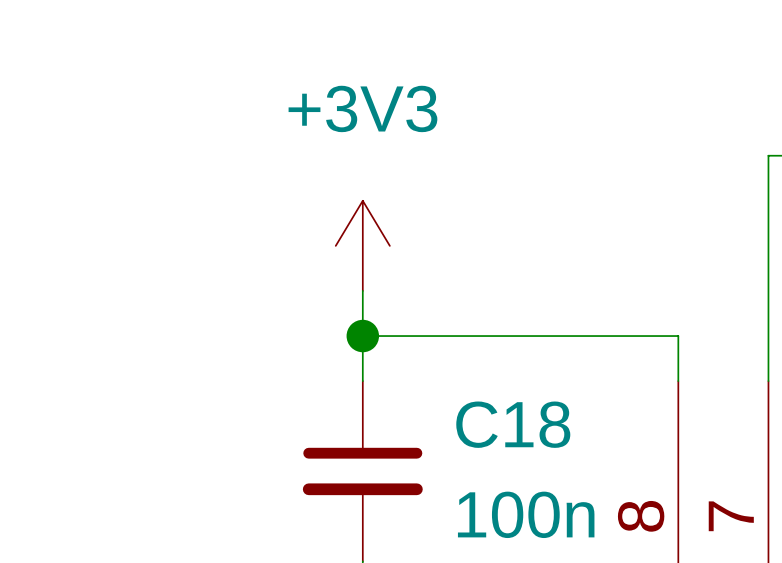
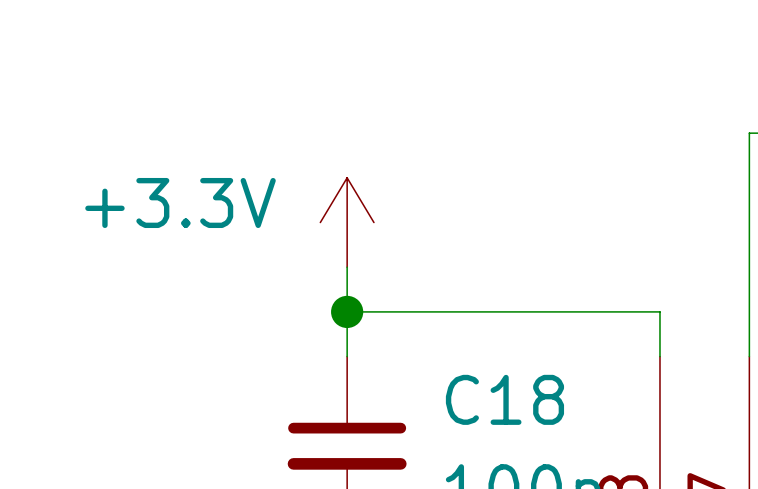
power symbol: +3V3 (362, 245) -> +3.3V (347, 222)

